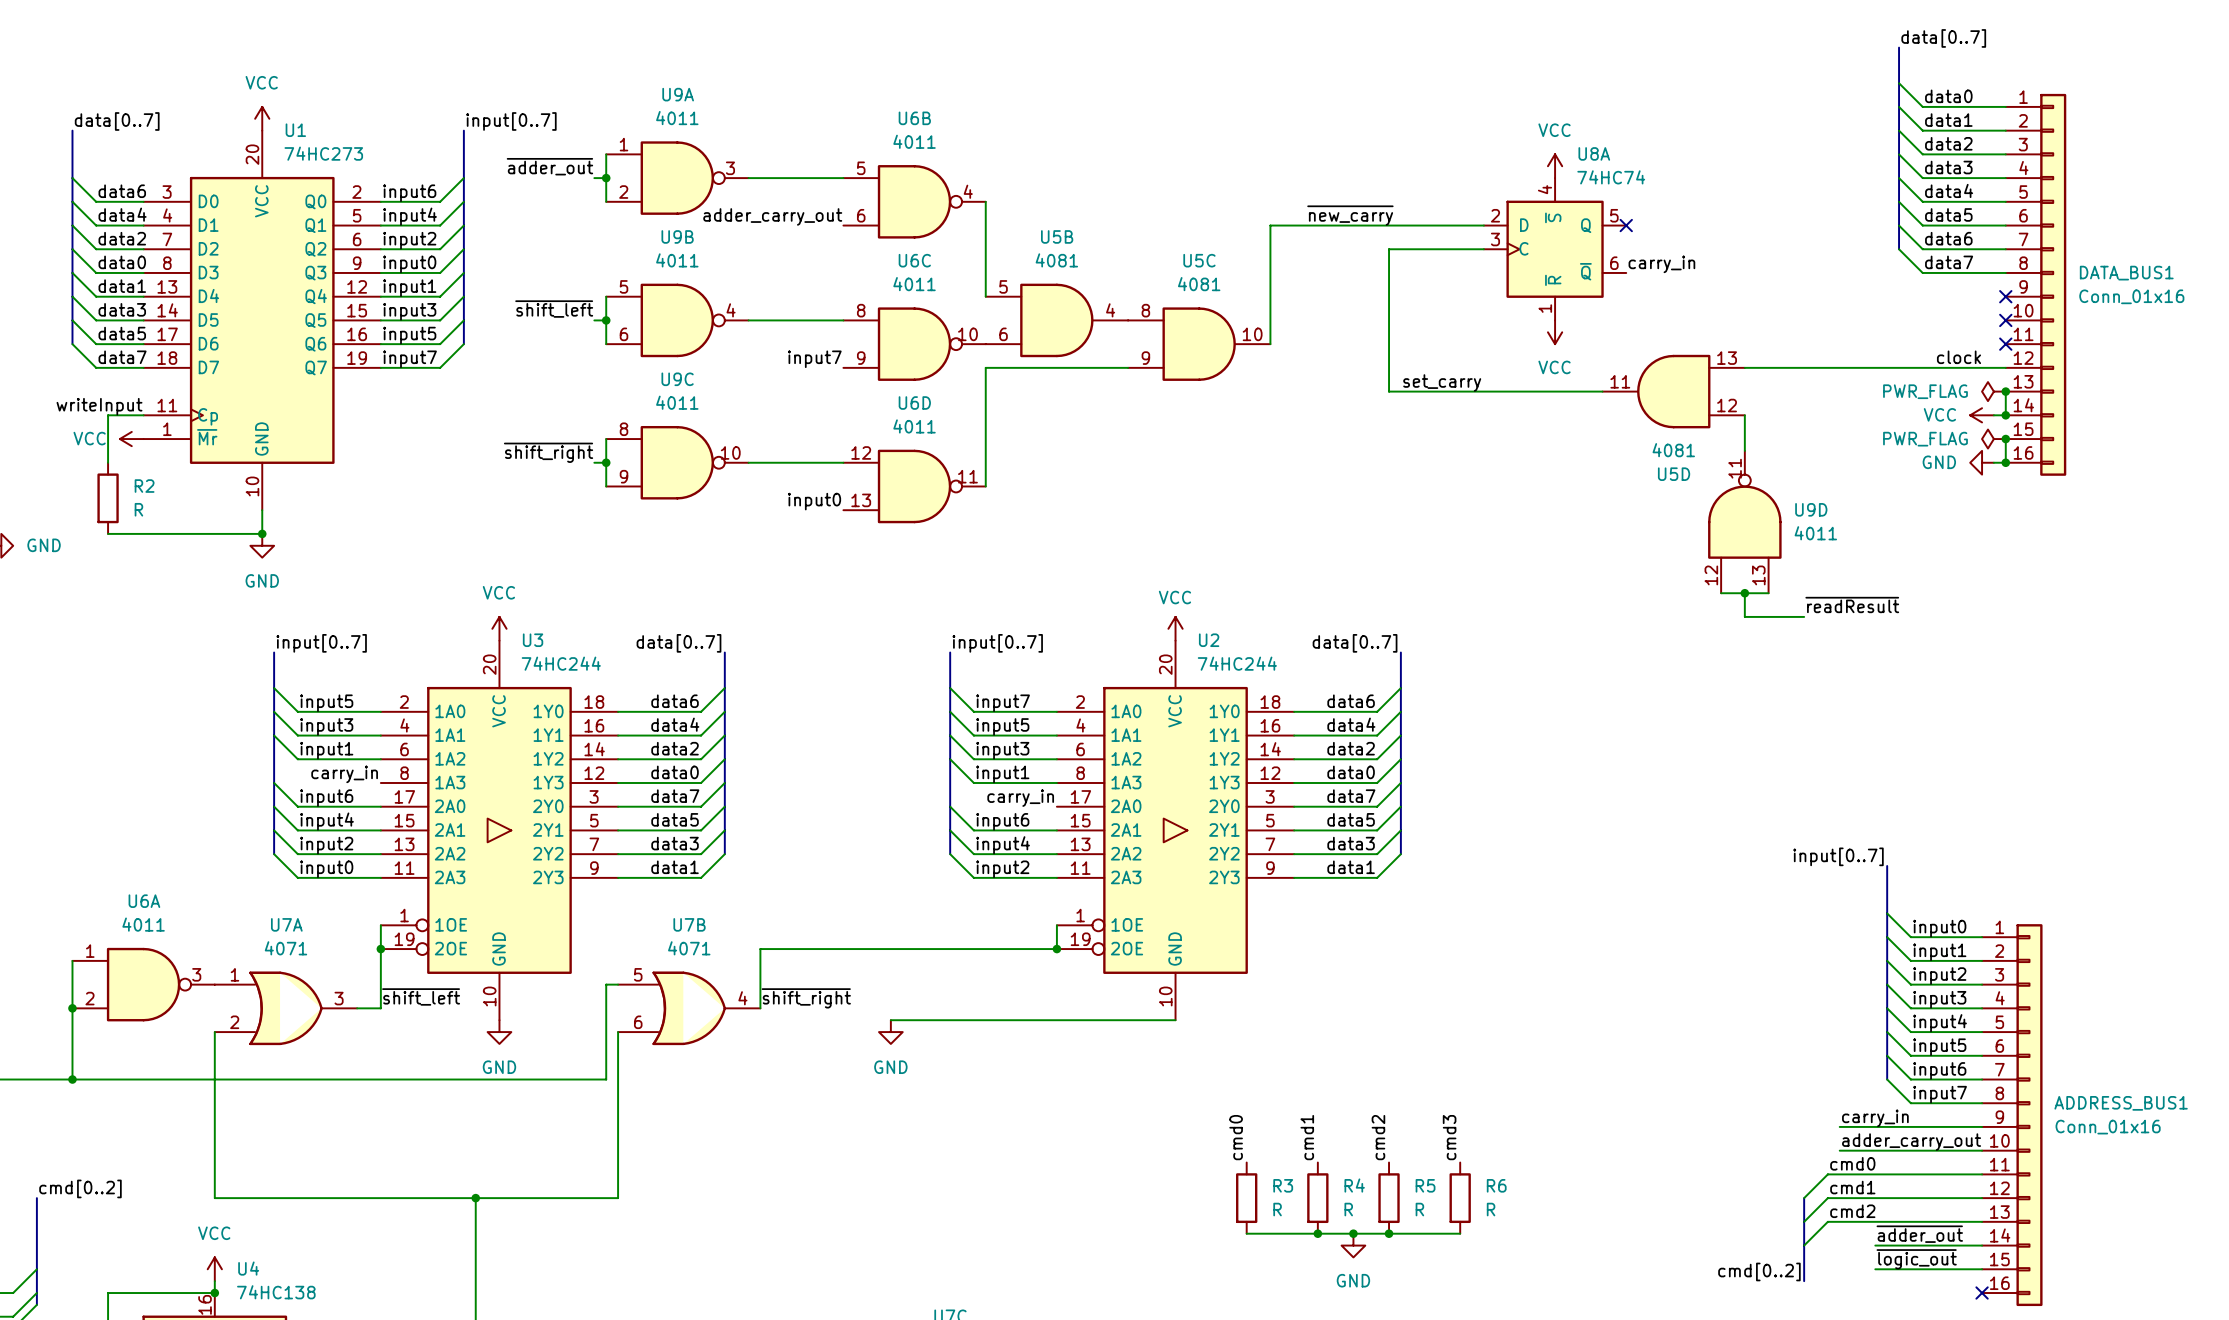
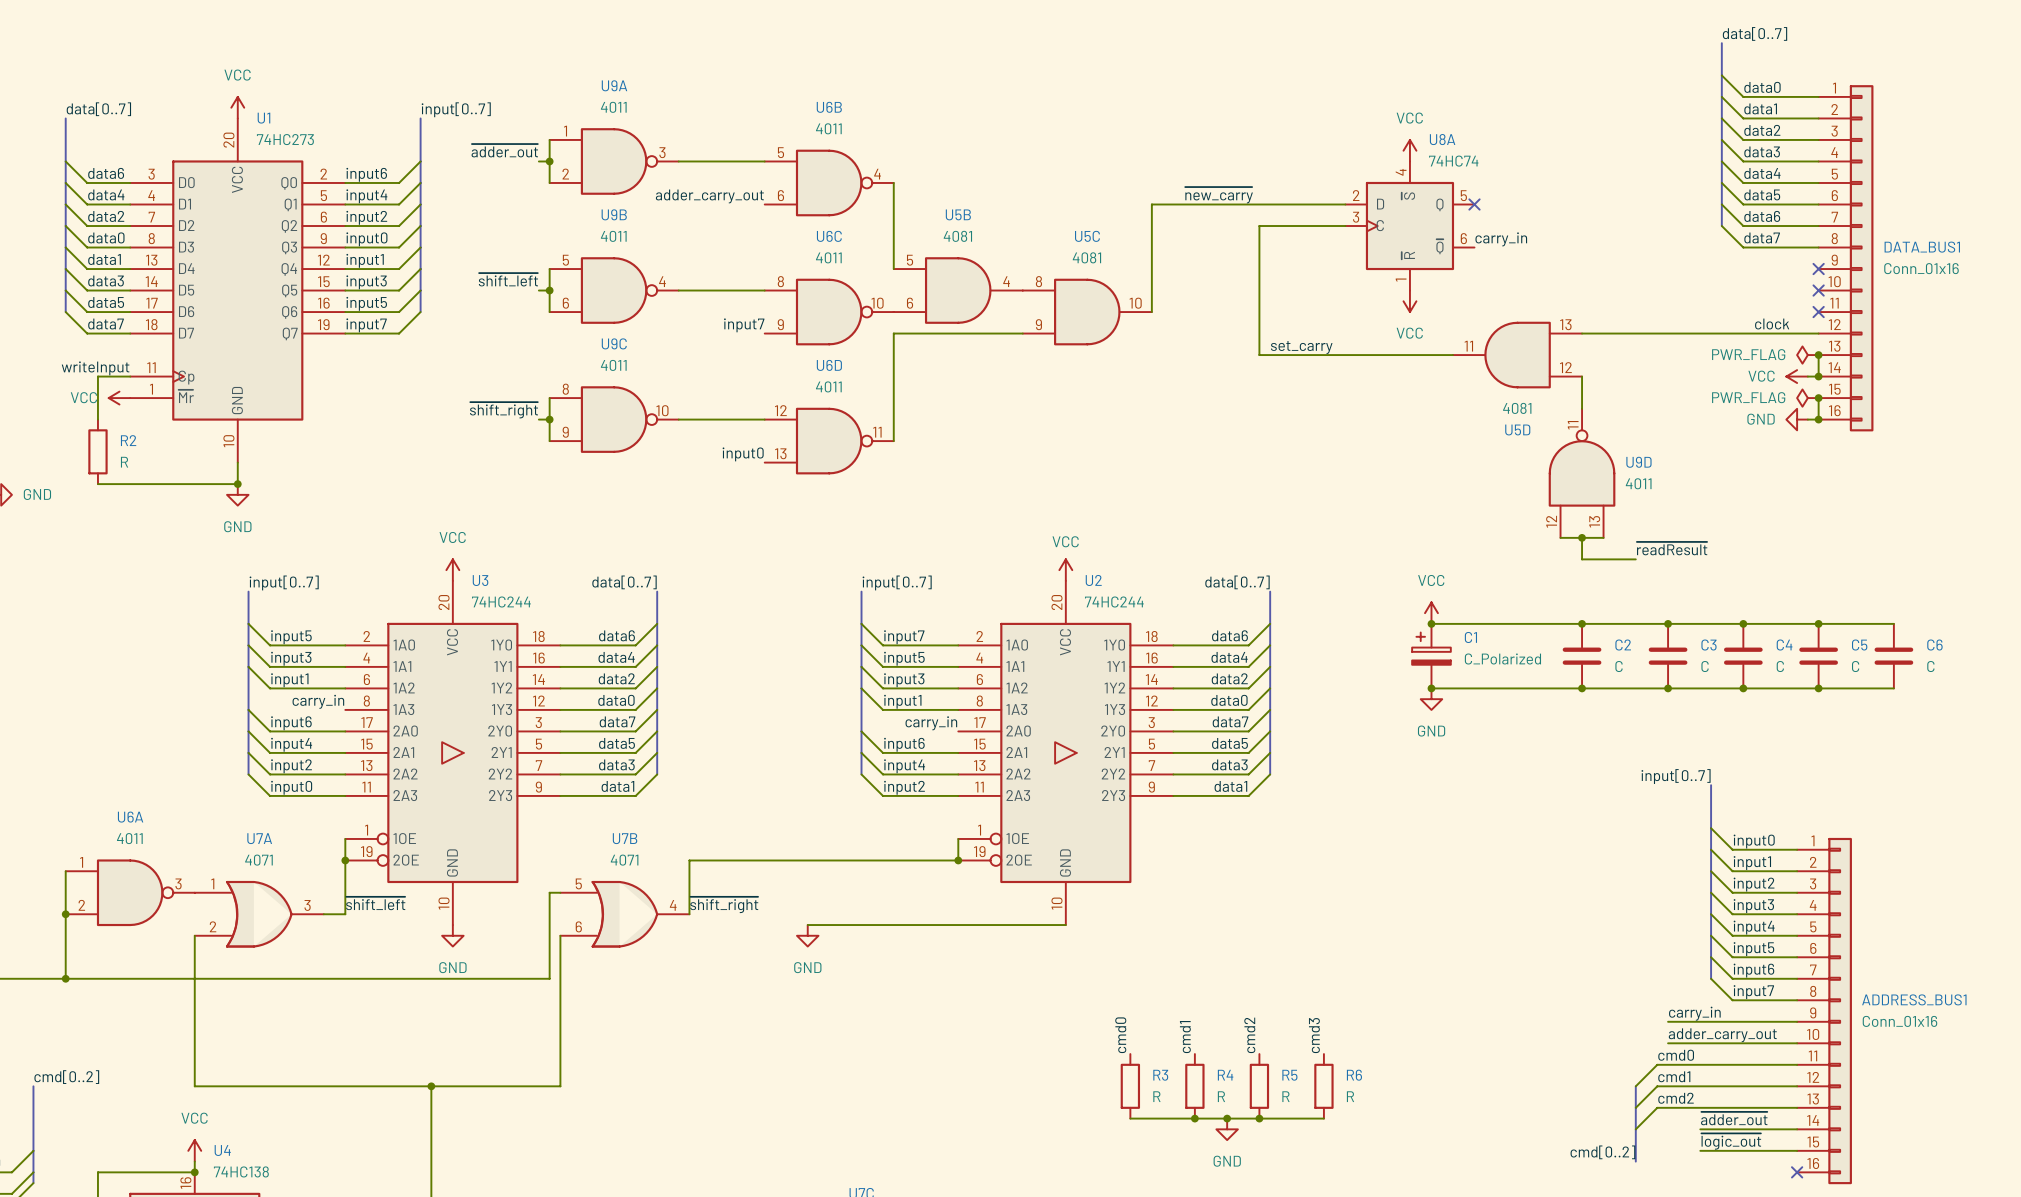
power symbol: none -> VCC (1431, 613)
wire: none -> (1431, 623) (1893, 623)
junction: none -> (1431, 623)
junction: none -> (1582, 623)
junction: none -> (1668, 623)
junction: none -> (1743, 623)
junction: none -> (1818, 623)
C1: none -> C_Polarized (1431, 656)
C2: none -> C (1582, 656)
C3: none -> C (1668, 656)
C4: none -> C (1743, 656)
C5: none -> C (1818, 656)
C6: none -> C (1893, 656)
wire: none -> (1431, 688) (1893, 688)
junction: none -> (1431, 688)
junction: none -> (1582, 688)
junction: none -> (1668, 688)
junction: none -> (1743, 688)
junction: none -> (1818, 688)
power symbol: none -> GND (1431, 699)

